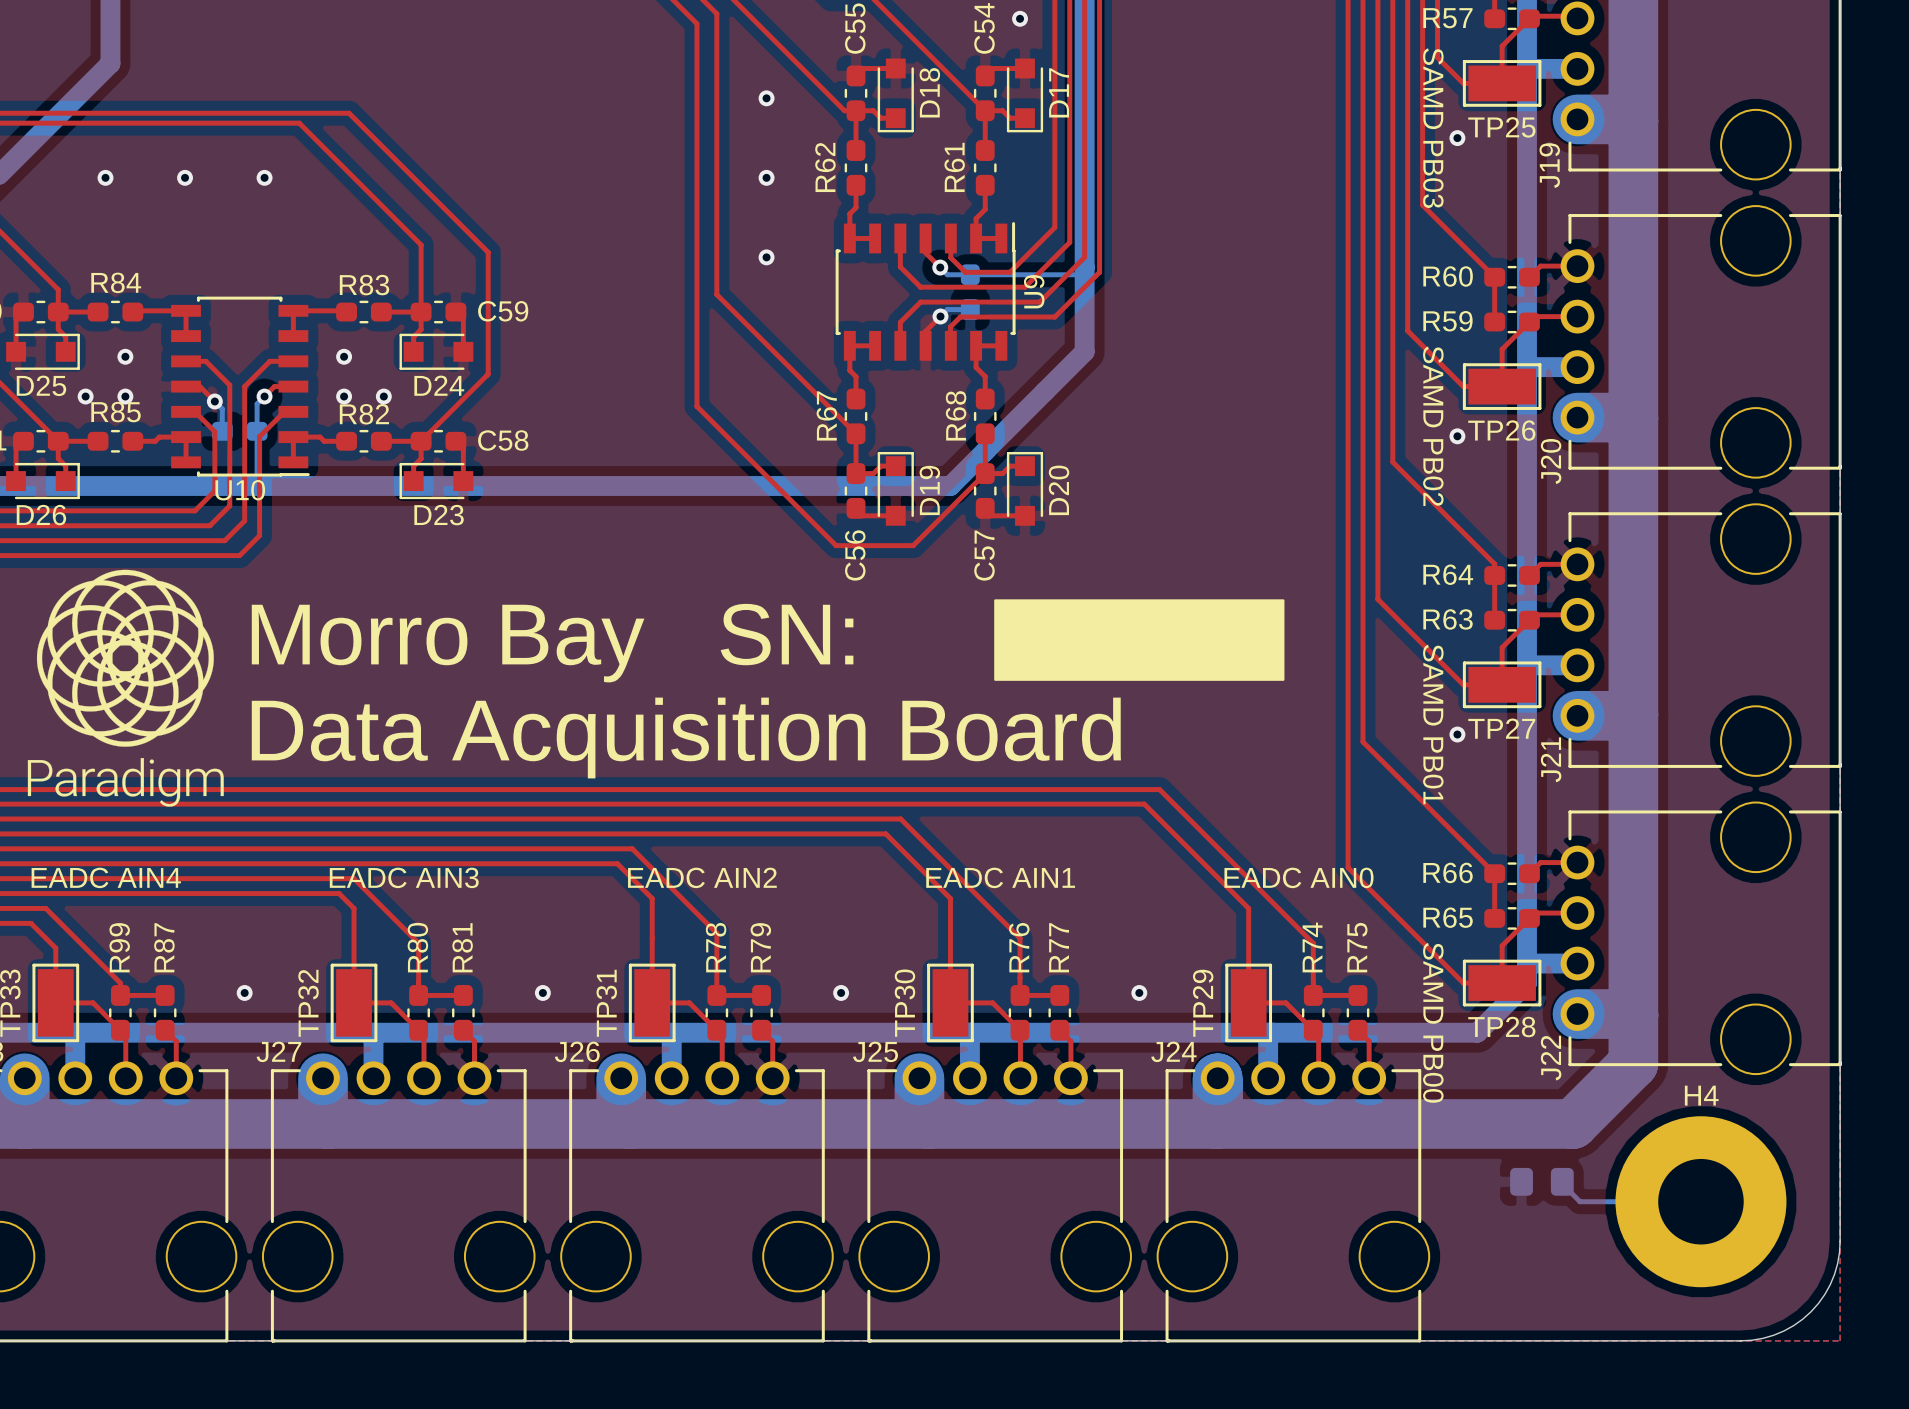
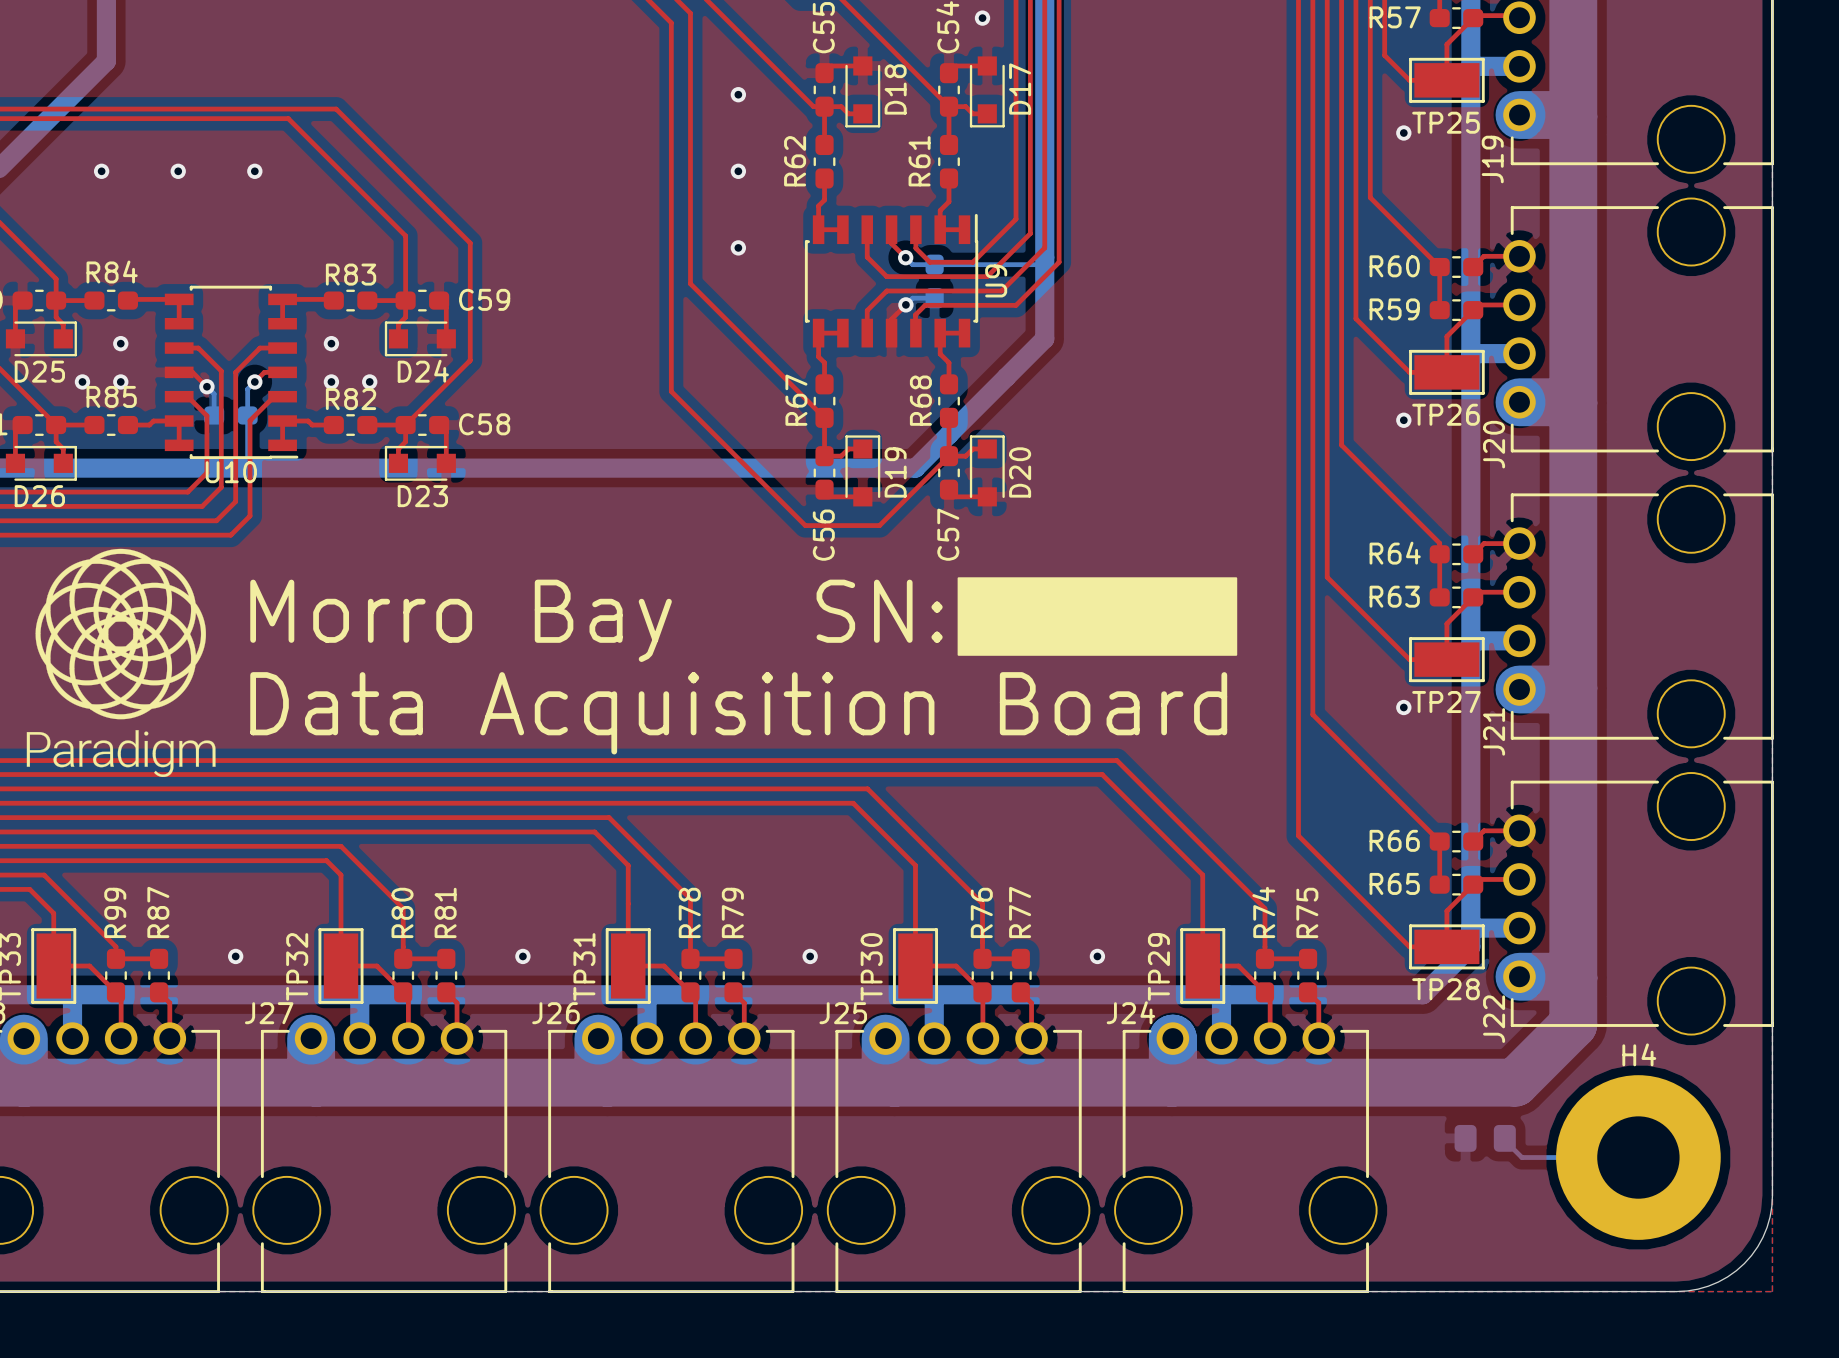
text: SAMD PB03 (1433, 128) -> none
text: SAMD PB02 (1433, 426) -> none
text: SAMD PB01 (1433, 724) -> none
text: EADC AIN4 (106, 877) -> none
text: EADC AIN3 (404, 877) -> none
text: EADC AIN2 (702, 877) -> none
text: EADC AIN1 (1000, 877) -> none
text: EADC AIN0 (1298, 877) -> none
text: SAMD PB00 (1433, 1022) -> none

